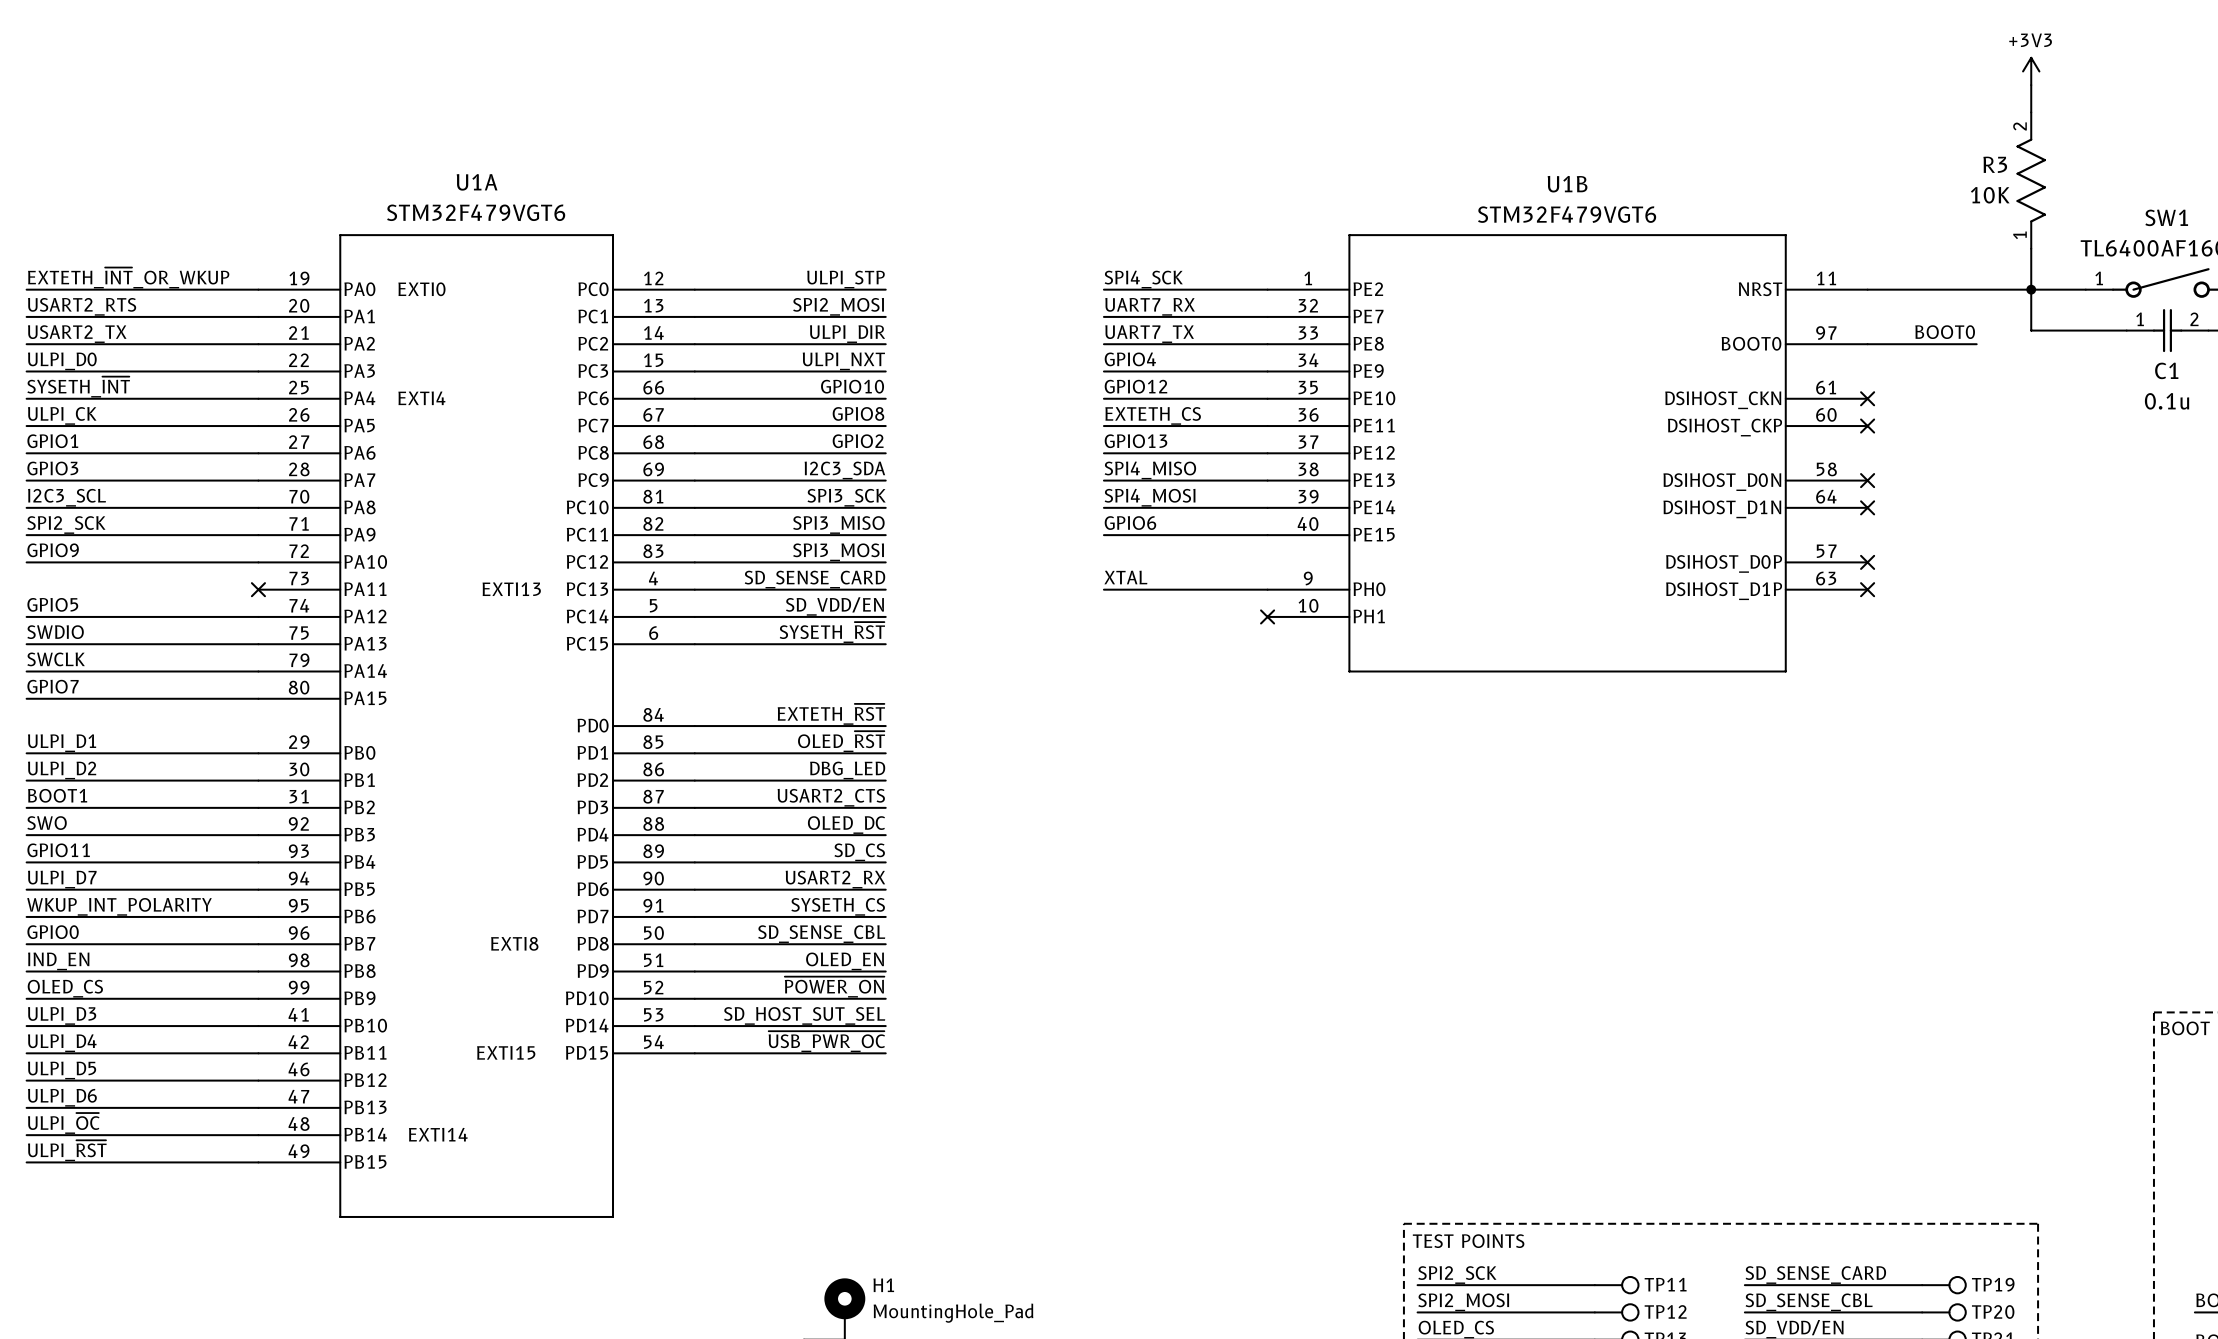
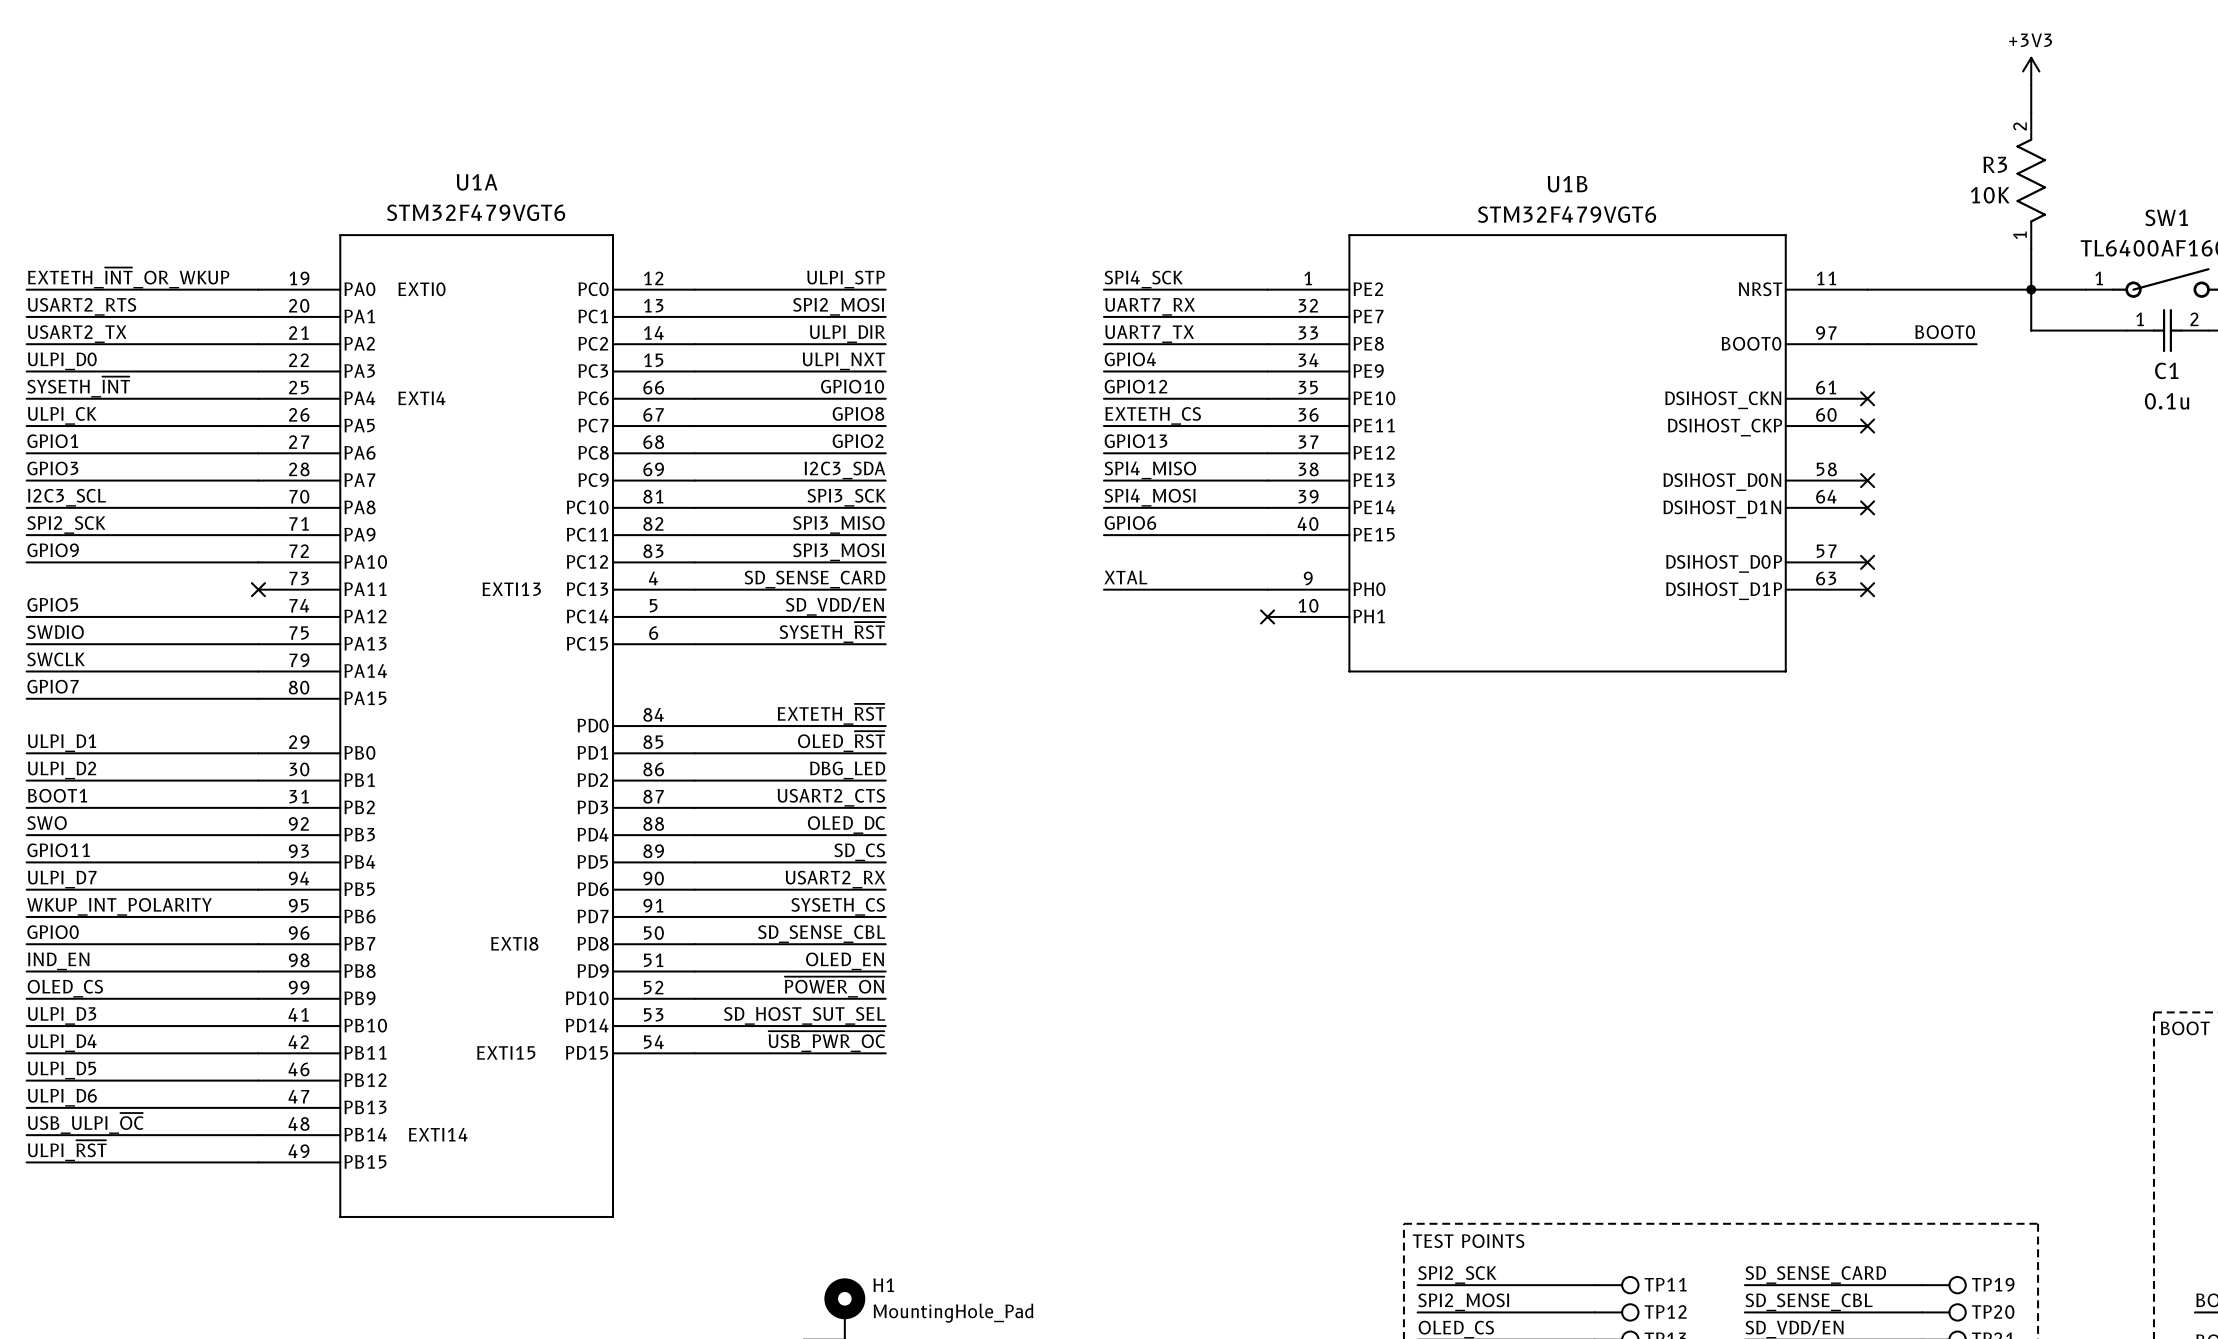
label: ULPI_~{OC} (63, 1123) -> USB_ULPI_~{OC} (85, 1123)

